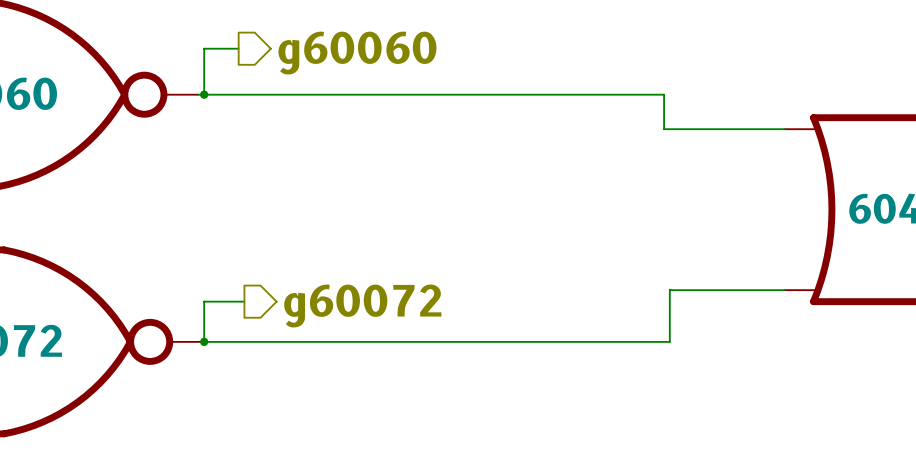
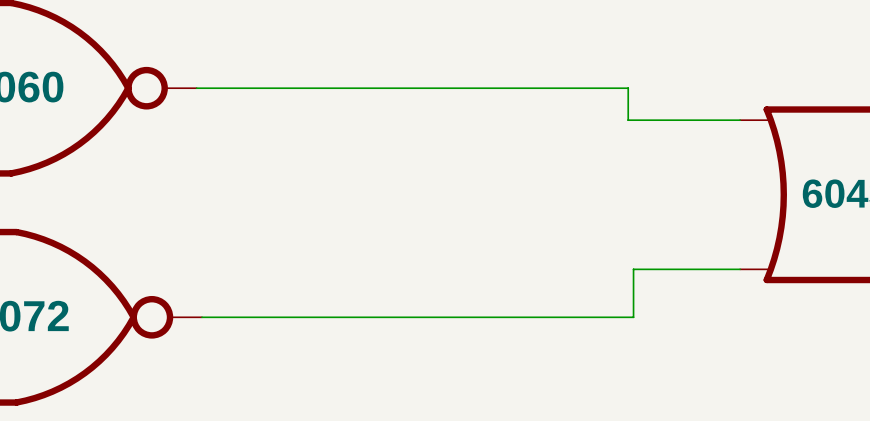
wire: (238, 48) (204, 48) (204, 94) -> none
hierarchical label: g60060 (357, 53) -> none
junction: (204, 94) -> none
wire: (244, 301) (204, 301) (204, 341) -> none
hierarchical label: g60072 (362, 306) -> none
junction: (204, 341) -> none

